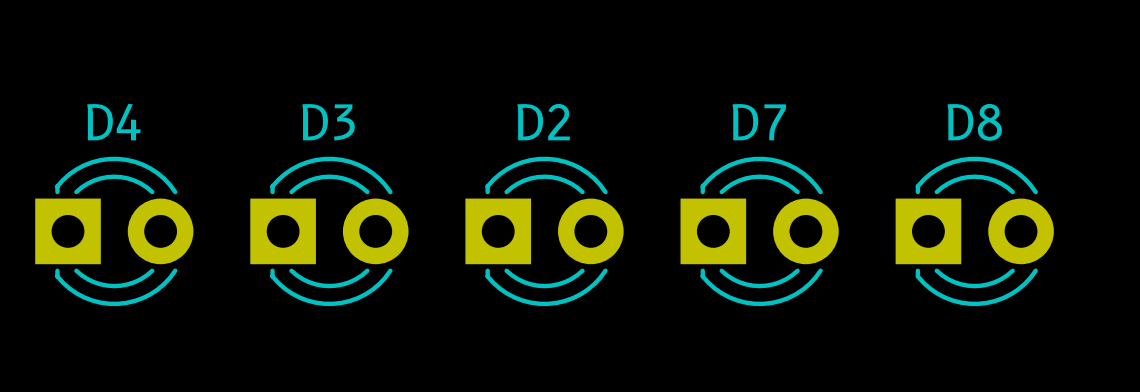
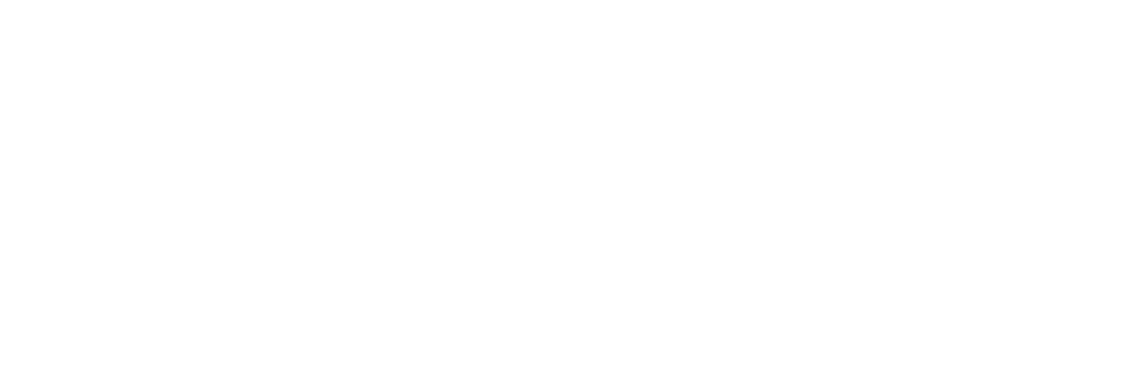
D4: (114, 231) -> none
D3: (329, 231) -> none
D2: (544, 231) -> none
D7: (759, 231) -> none
D8: (974, 231) -> none

